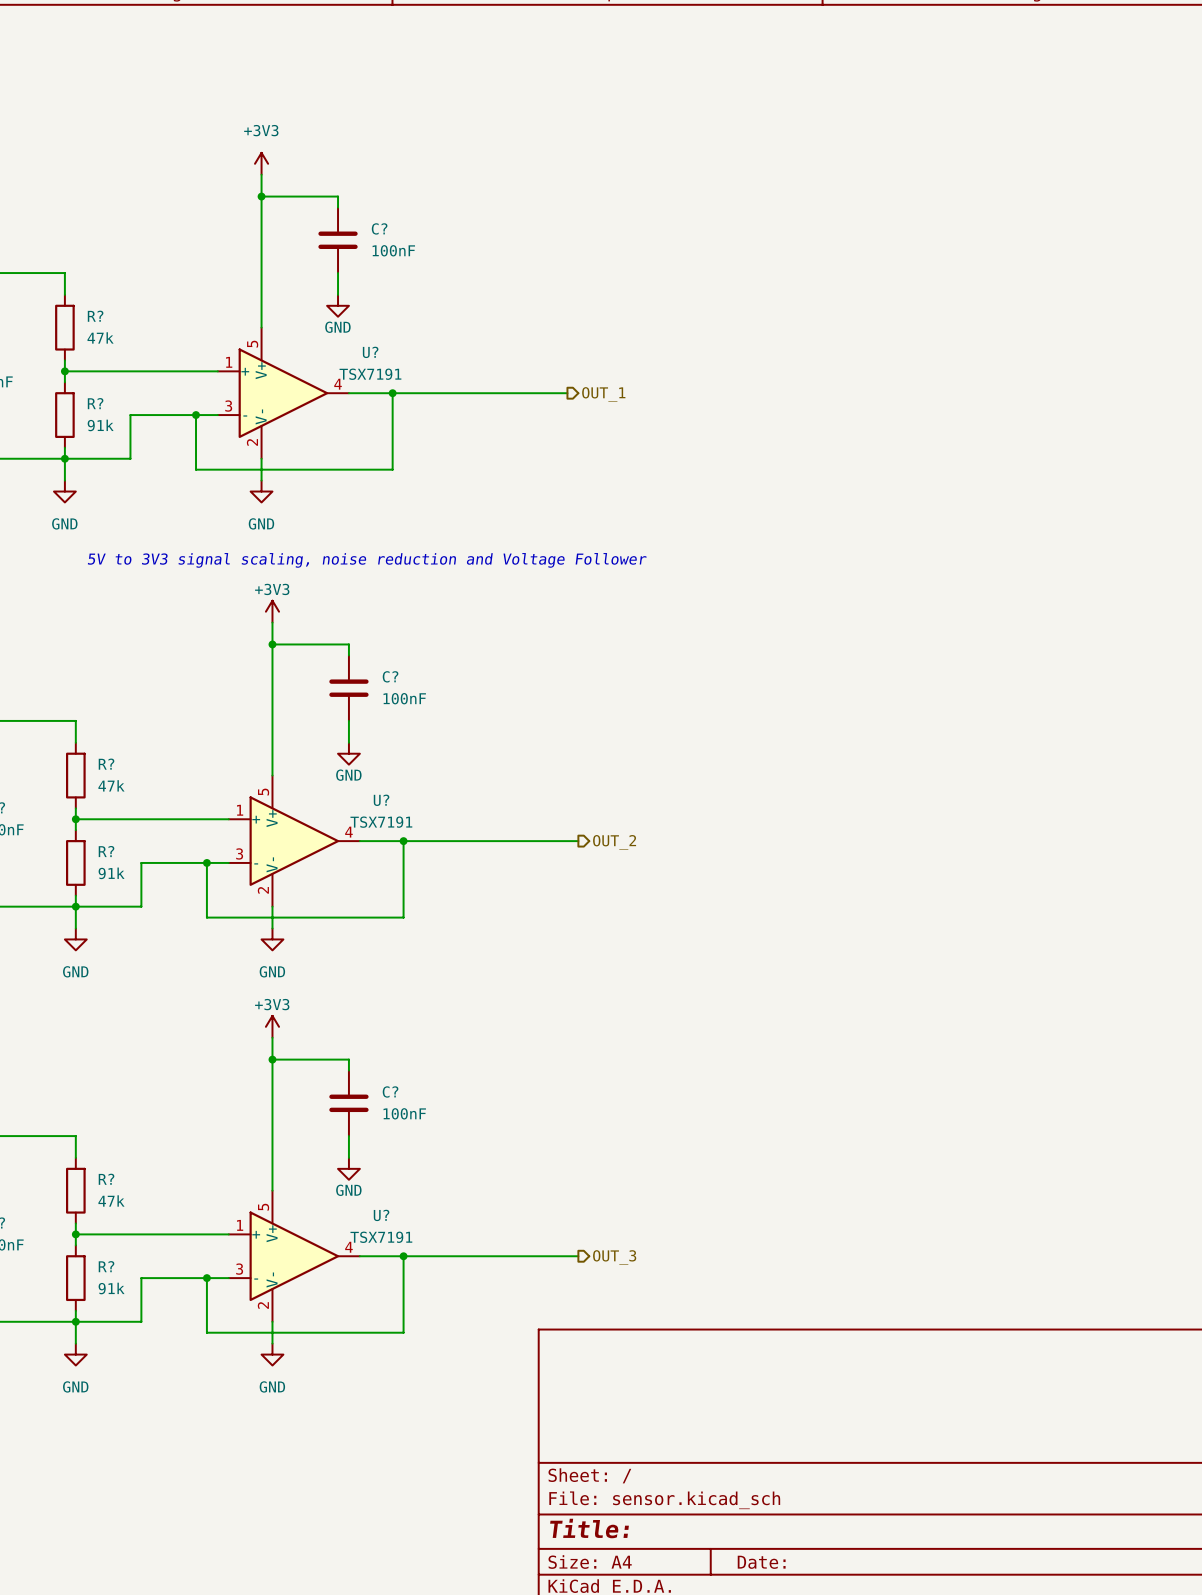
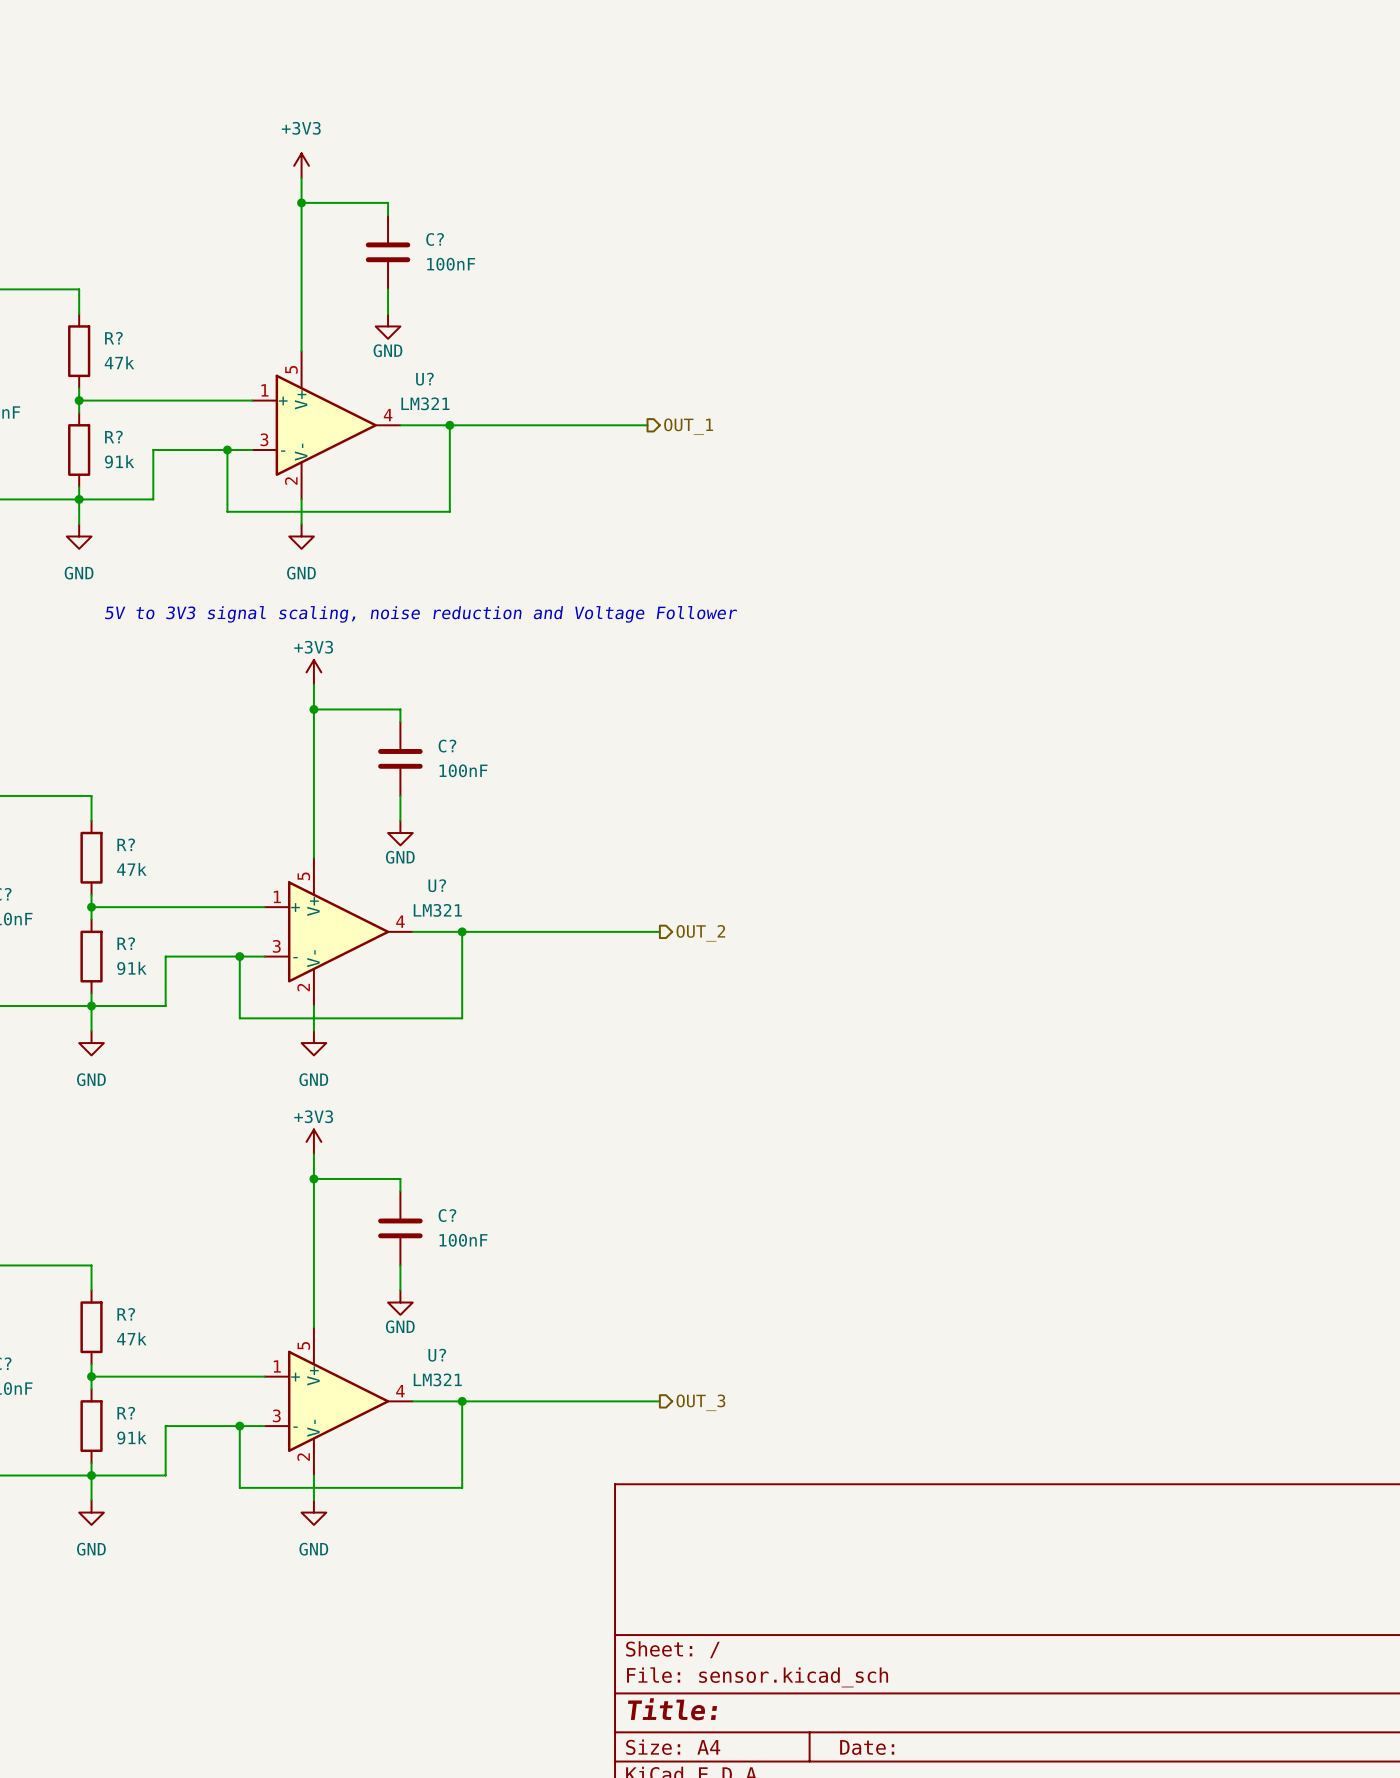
U? value: TSX7191 (370, 374) -> LM321 (425, 403)
U? value: TSX7191 (381, 822) -> LM321 (437, 910)
U? value: TSX7191 (381, 1237) -> LM321 (437, 1379)

